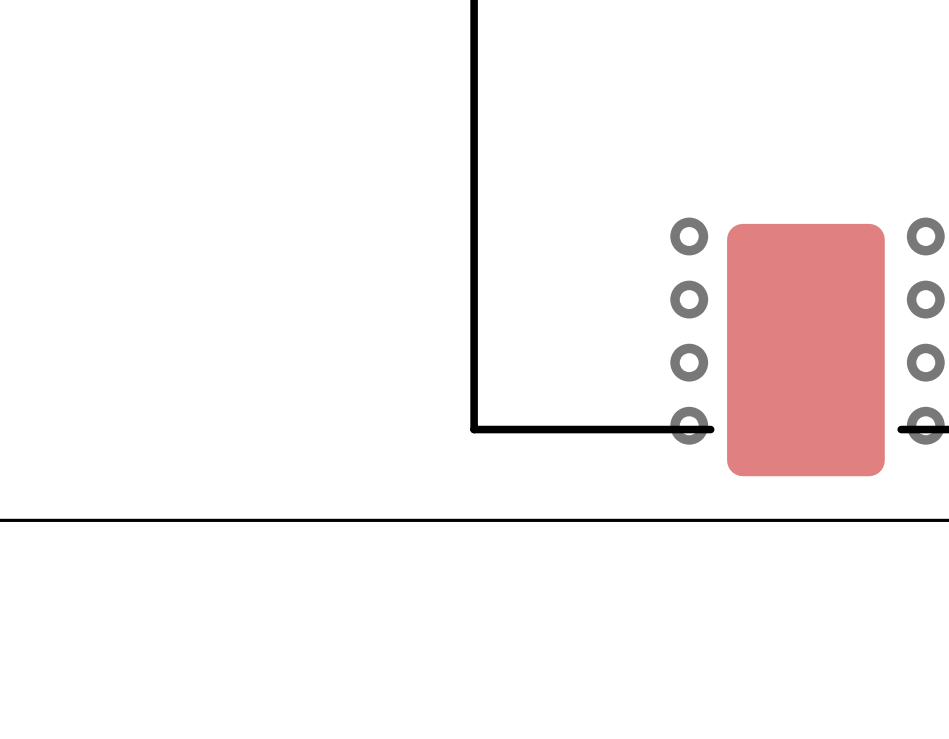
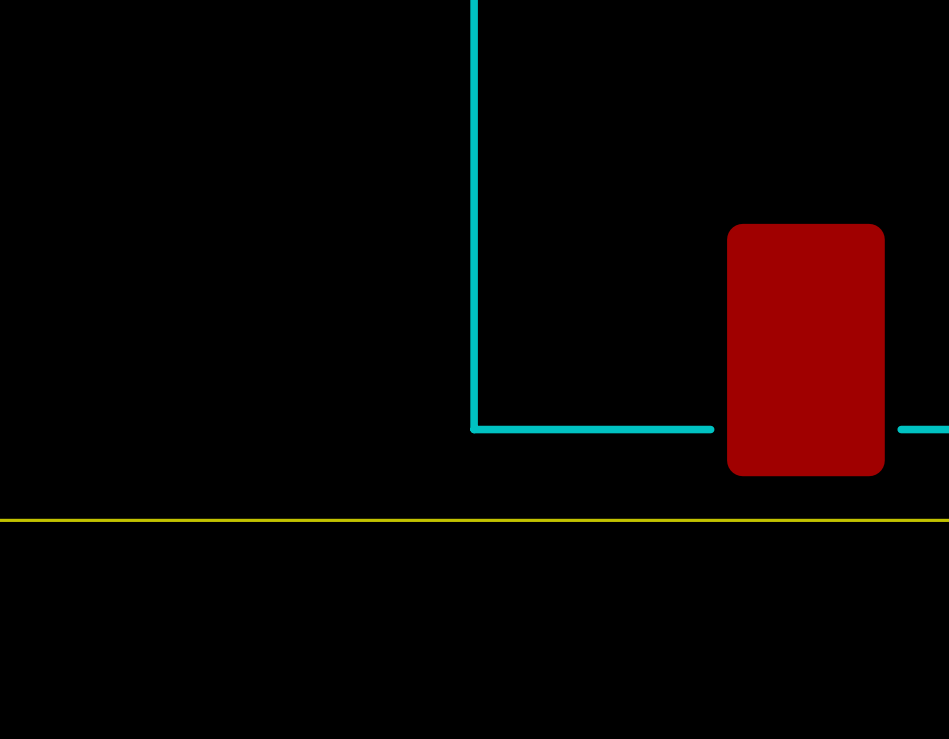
via: (689, 236) -> none
via: (925, 236) -> none
via: (689, 299) -> none
via: (925, 299) -> none
via: (689, 362) -> none
via: (925, 362) -> none
via: (689, 425) -> none
via: (925, 425) -> none

